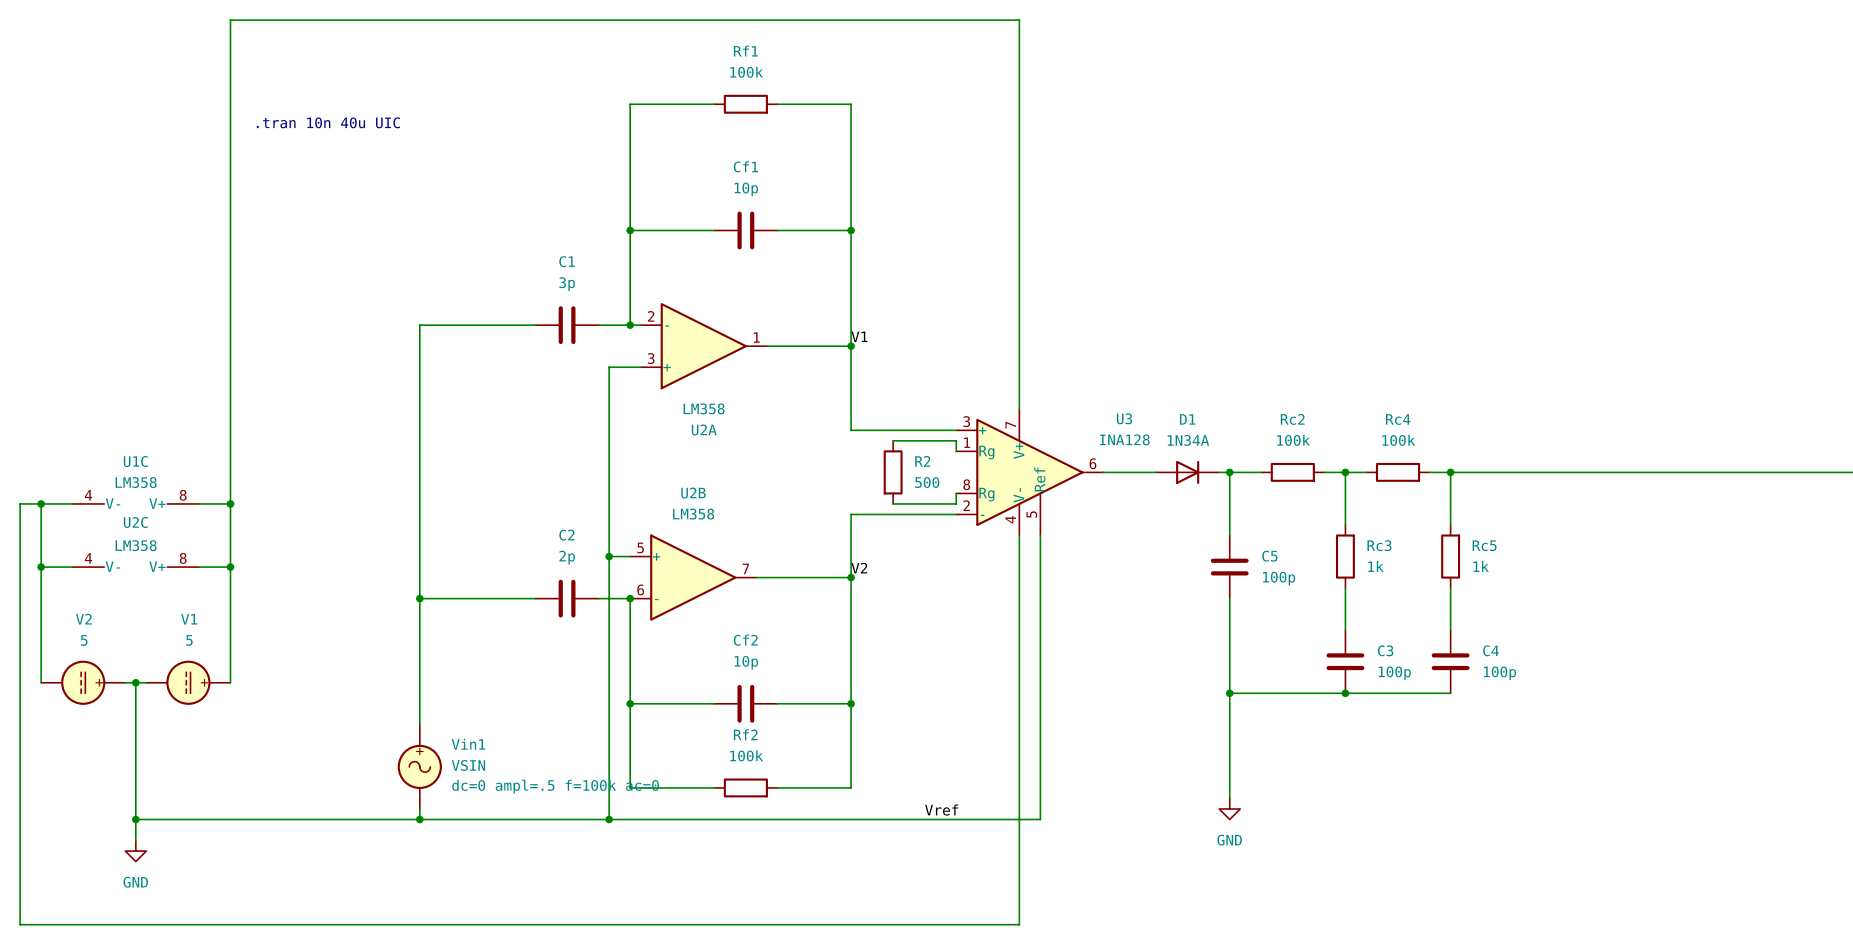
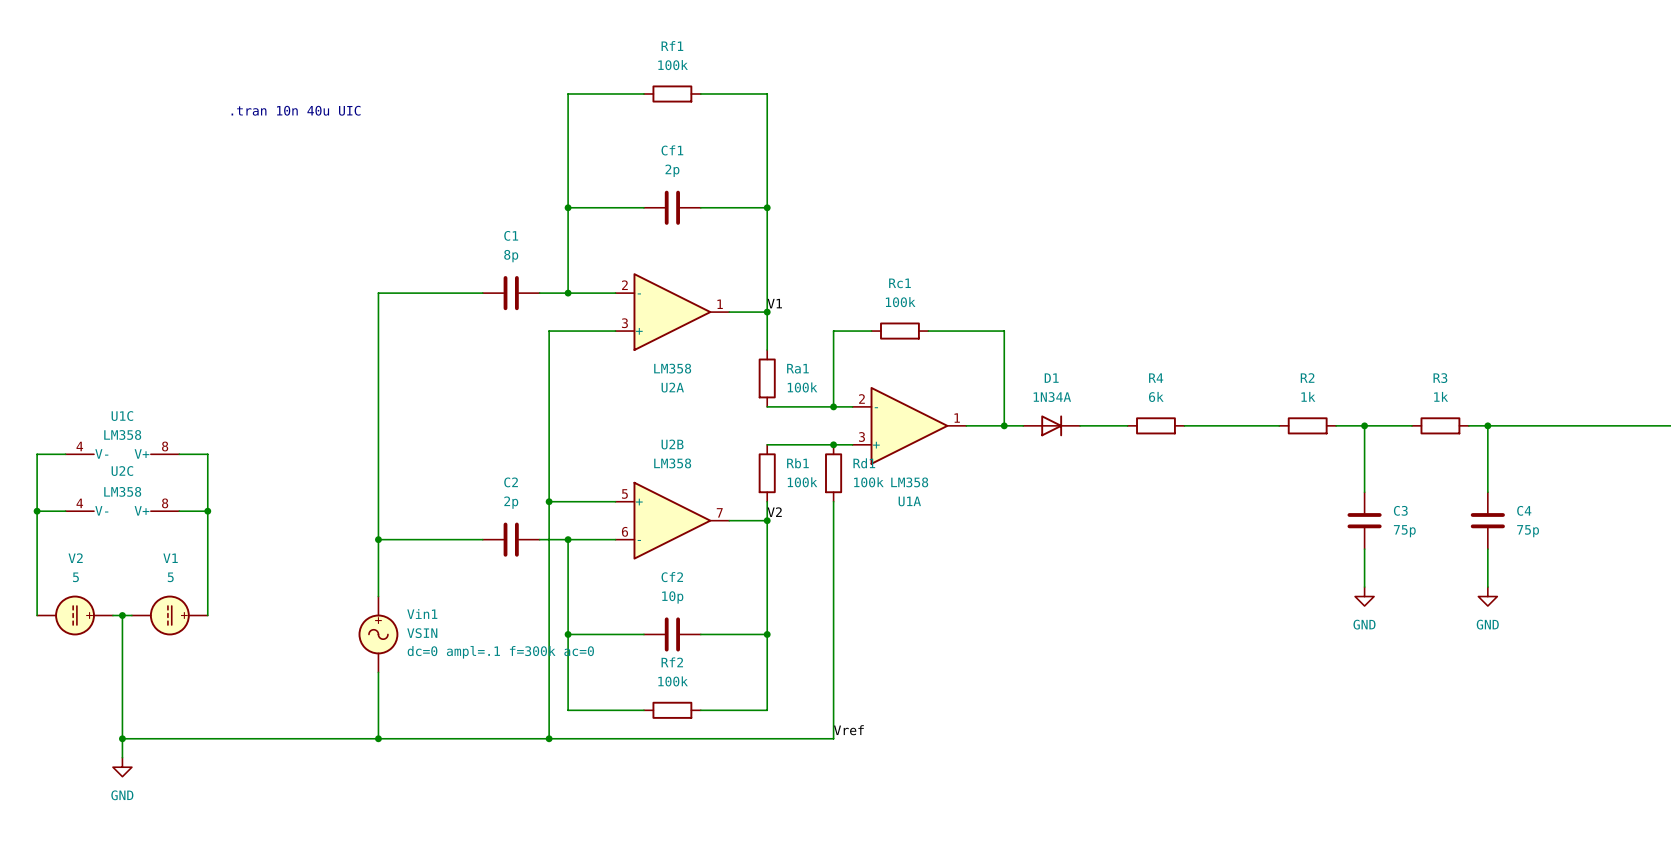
Cf1 value: 10p (746, 189) -> 2p (672, 170)
C1 value: 3p (567, 284) -> 8p (511, 256)
U2A position: (703, 346) -> (672, 312)
wire: none -> (871, 331) (833, 331) (833, 406)
Rc1: none -> 100k (899, 331)
wire: none -> (928, 331) (1004, 331) (1004, 425)
wire: (851, 388) (851, 430) (956, 430) -> none
wire: (1019, 409) (1019, 20) (230, 20) (230, 503) -> none
Ra1: none -> 100k (767, 378)
wire: (893, 440) (956, 440) (956, 451) -> none
wire: none -> (767, 406) (852, 406)
junction: none -> (833, 406)
R2 name position: R2 (922, 461) -> R2 (1307, 378)
R2 rotation: 0° (893, 472) -> 90° clockwise (1307, 425)
R2 position: (893, 472) -> (1307, 425)
U1A: none -> LM358 (909, 425)
U3: INA128 (1029, 472) -> none
junction: none -> (1004, 425)
D1 position: (1187, 472) -> (1051, 425)
wire: (1229, 472) (1229, 535) -> none
junction: (1229, 472) -> none
R4: none -> 6k (1155, 425)
Rc2: 100k (1292, 472) -> none
wire: (1345, 472) (1345, 525) -> none
junction: (1345, 472) -> none
Rc4: 100k (1398, 472) -> none
wire: (1429, 472) (1482, 472) -> (1231, 425) (1279, 425)
wire: (1450, 472) (1450, 525) -> none
junction: (1450, 472) -> none
wire: none -> (1364, 425) (1364, 492)
junction: none -> (1364, 425)
wire: (1566, 472) (1629, 472) -> none
R3: none -> 1k (1440, 425)
wire: none -> (1487, 425) (1487, 492)
junction: none -> (1487, 425)
R2 value: 500 (927, 482) -> 1k (1308, 396)
wire: none -> (767, 444) (852, 444)
junction: none -> (833, 444)
wire: (956, 493) (956, 503) (893, 503) -> none
wire: (41, 503) (20, 503) (20, 924) (1019, 924) (1019, 535) -> none
junction: (41, 503) -> none
junction: (230, 503) -> none
wire: (956, 514) (851, 514) (851, 556) -> none
Rb1: none -> 100k (767, 473)
Rd1: none -> 100k (833, 473)
wire: (1040, 535) (1040, 819) (924, 819) -> (833, 501) (833, 738)
Rc3: 1k (1345, 556) -> none
Rc5: 1k (1450, 556) -> none
C5: 100p (1229, 567) -> none
U2B position: (693, 577) -> (672, 520)
wire: (1345, 588) (1345, 630) -> none
wire: (1450, 588) (1450, 630) -> (1364, 549) (1364, 587)
wire: (1229, 598) (1229, 798) -> none
wire: none -> (1487, 549) (1487, 587)
C3 position: (1345, 661) -> (1364, 520)
C4 position: (1450, 661) -> (1487, 520)
power symbol: none -> GND (1364, 596)
power symbol: none -> GND (1487, 596)
C3 value: 100p (1394, 673) -> 75p (1404, 531)
C4 value: 100p (1499, 673) -> 75p (1528, 531)
wire: (1229, 693) (1450, 693) -> none
junction: (1229, 693) -> none
junction: (1345, 693) -> none
Vin1 position: (419, 766) -> (378, 634)
Vin1 text: dc=0 ampl=.5 f=100k ac=0 (555, 786) -> dc=0 ampl=.1 f=300k ac=0 (500, 652)
power symbol: GND (1229, 808) -> none

